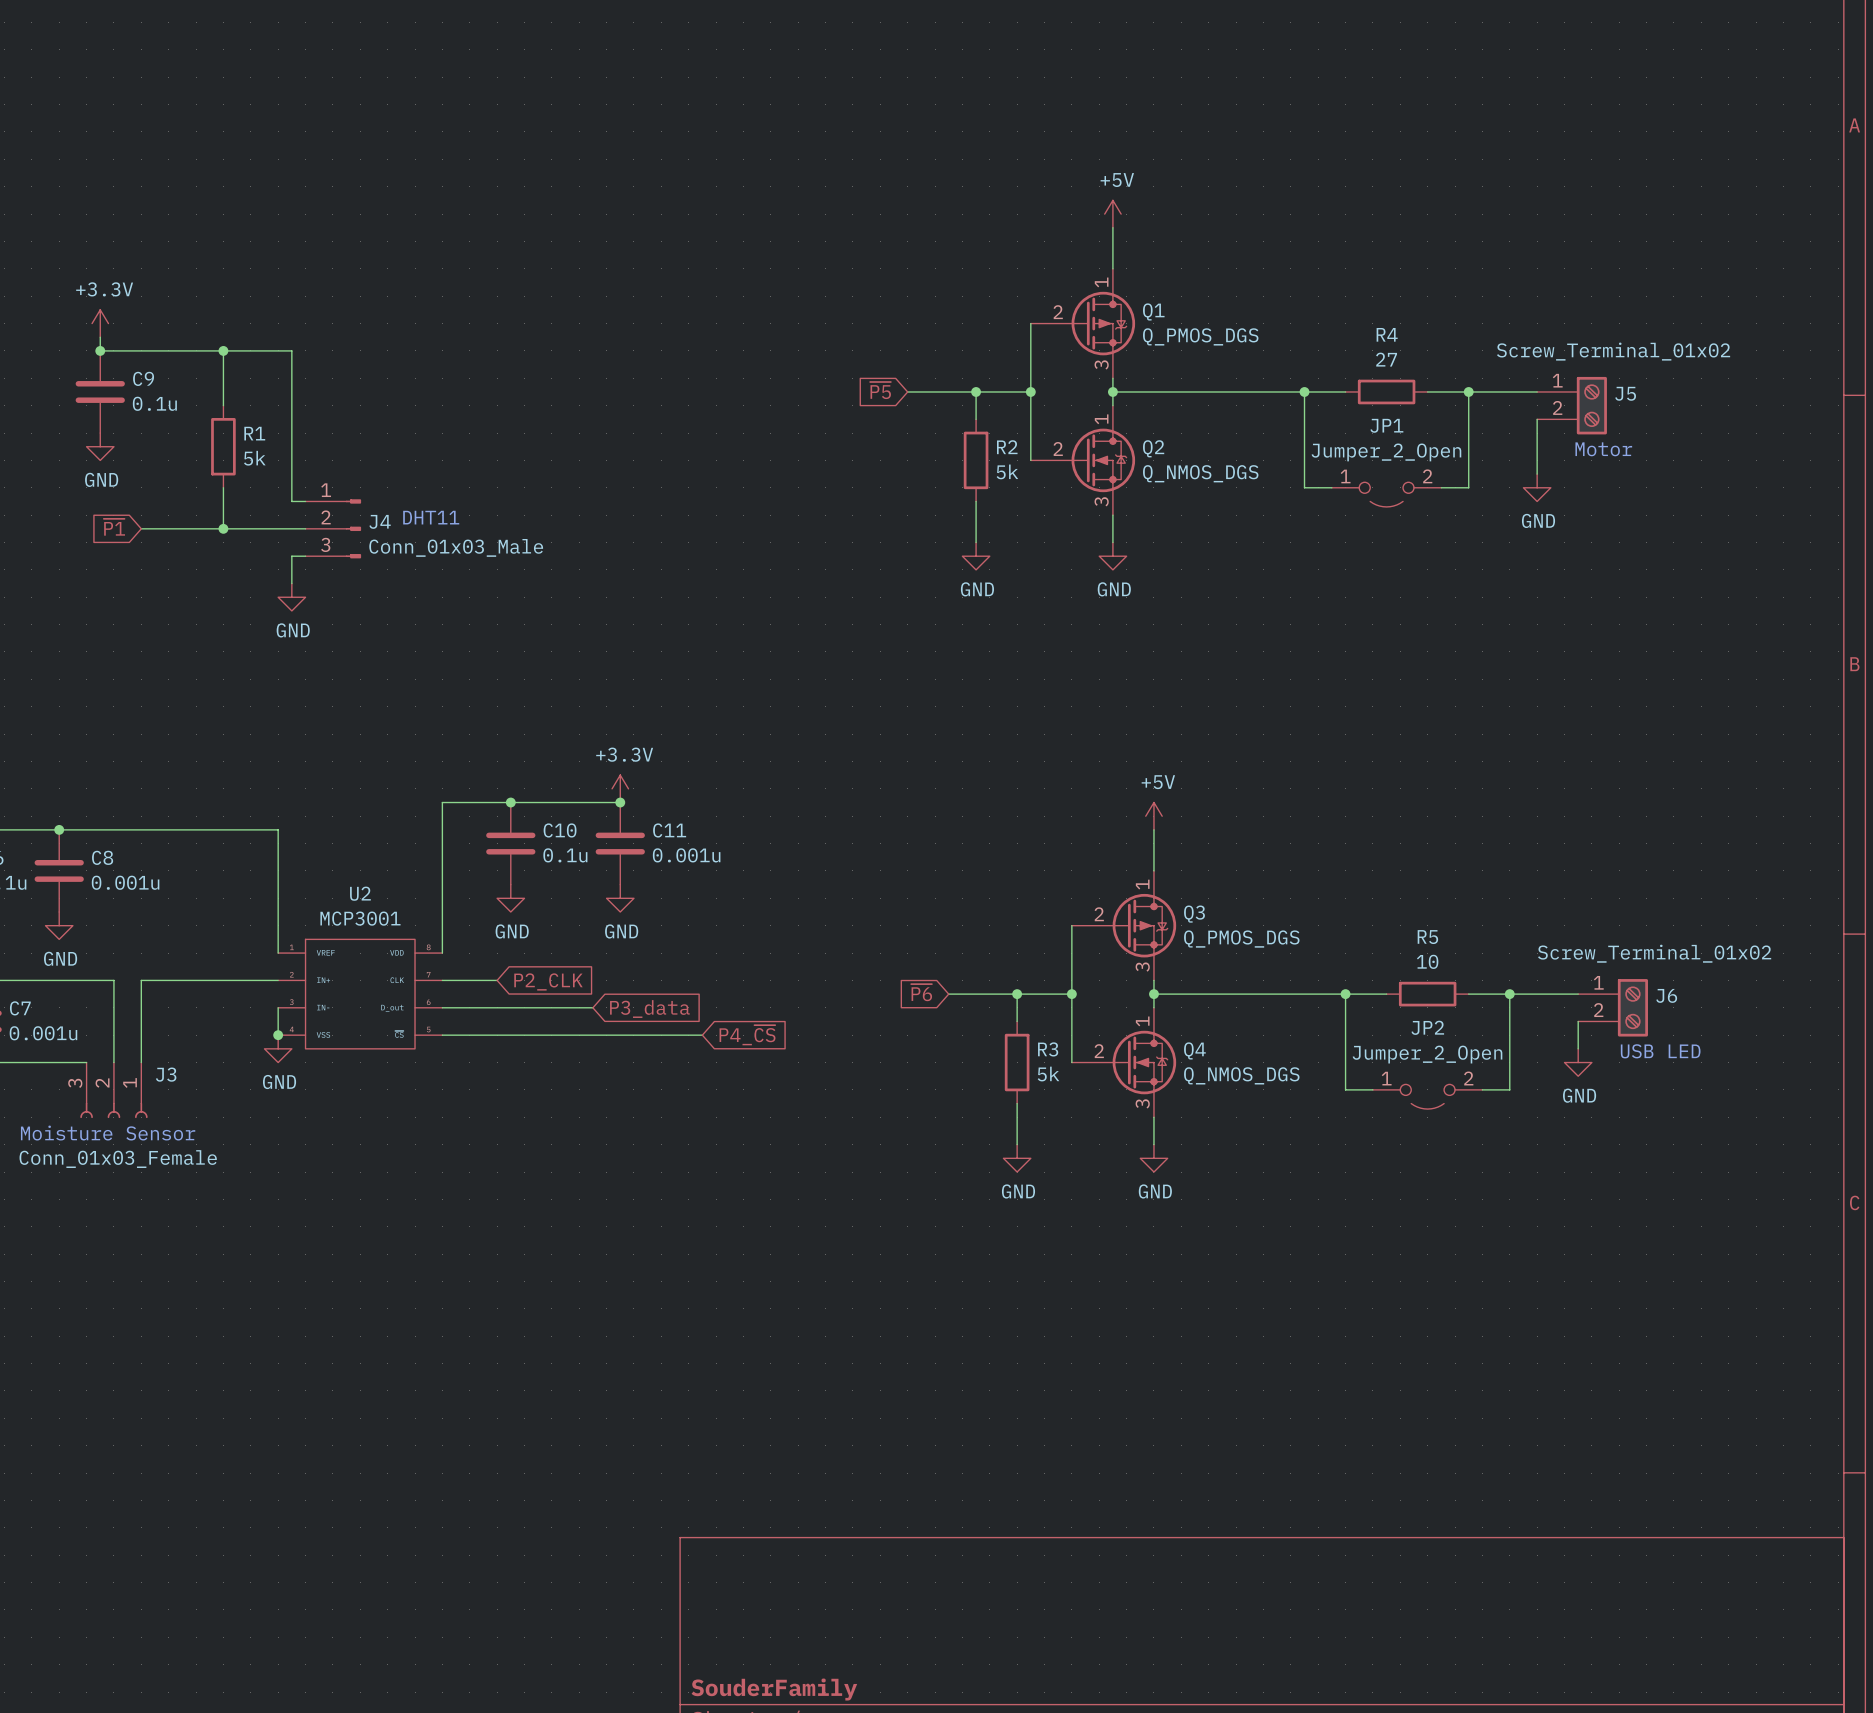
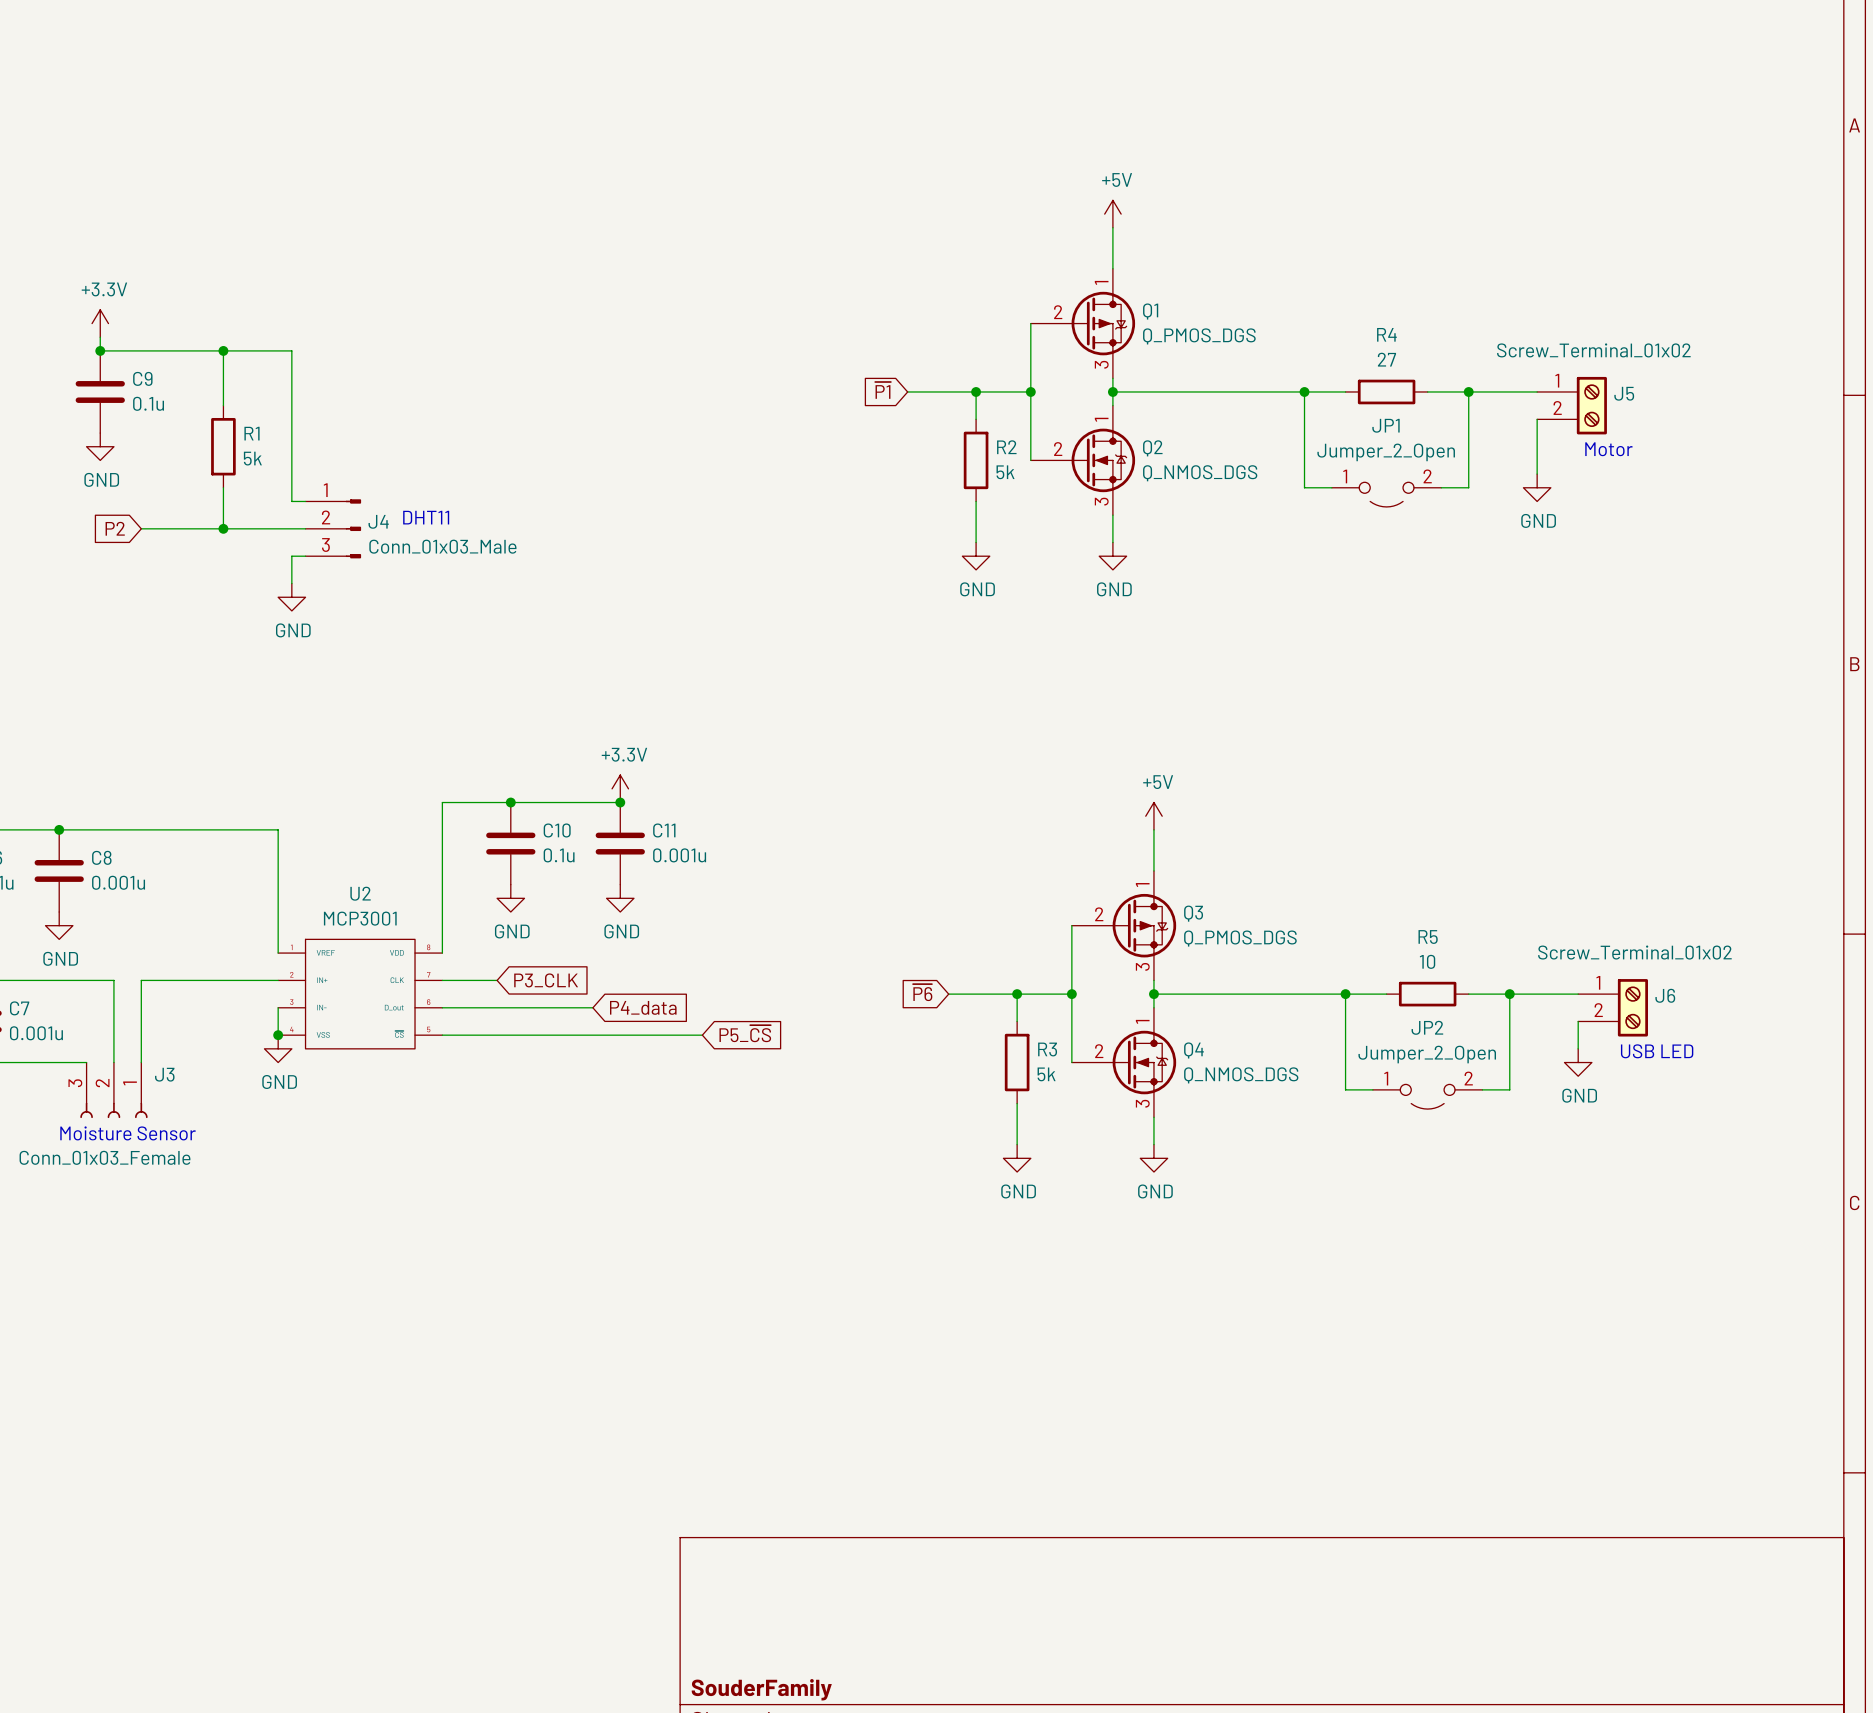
global label: ~{P5} (880, 390) -> ~{P1} (883, 390)
global label: ~{P1} (114, 527) -> P2 (115, 528)
global label: P2_CLK (548, 981) -> P3_CLK (546, 980)
global label: P3_data (649, 1009) -> P4_data (643, 1007)
global label: P4_~{CS} (747, 1035) -> P5_~{CS} (745, 1033)

